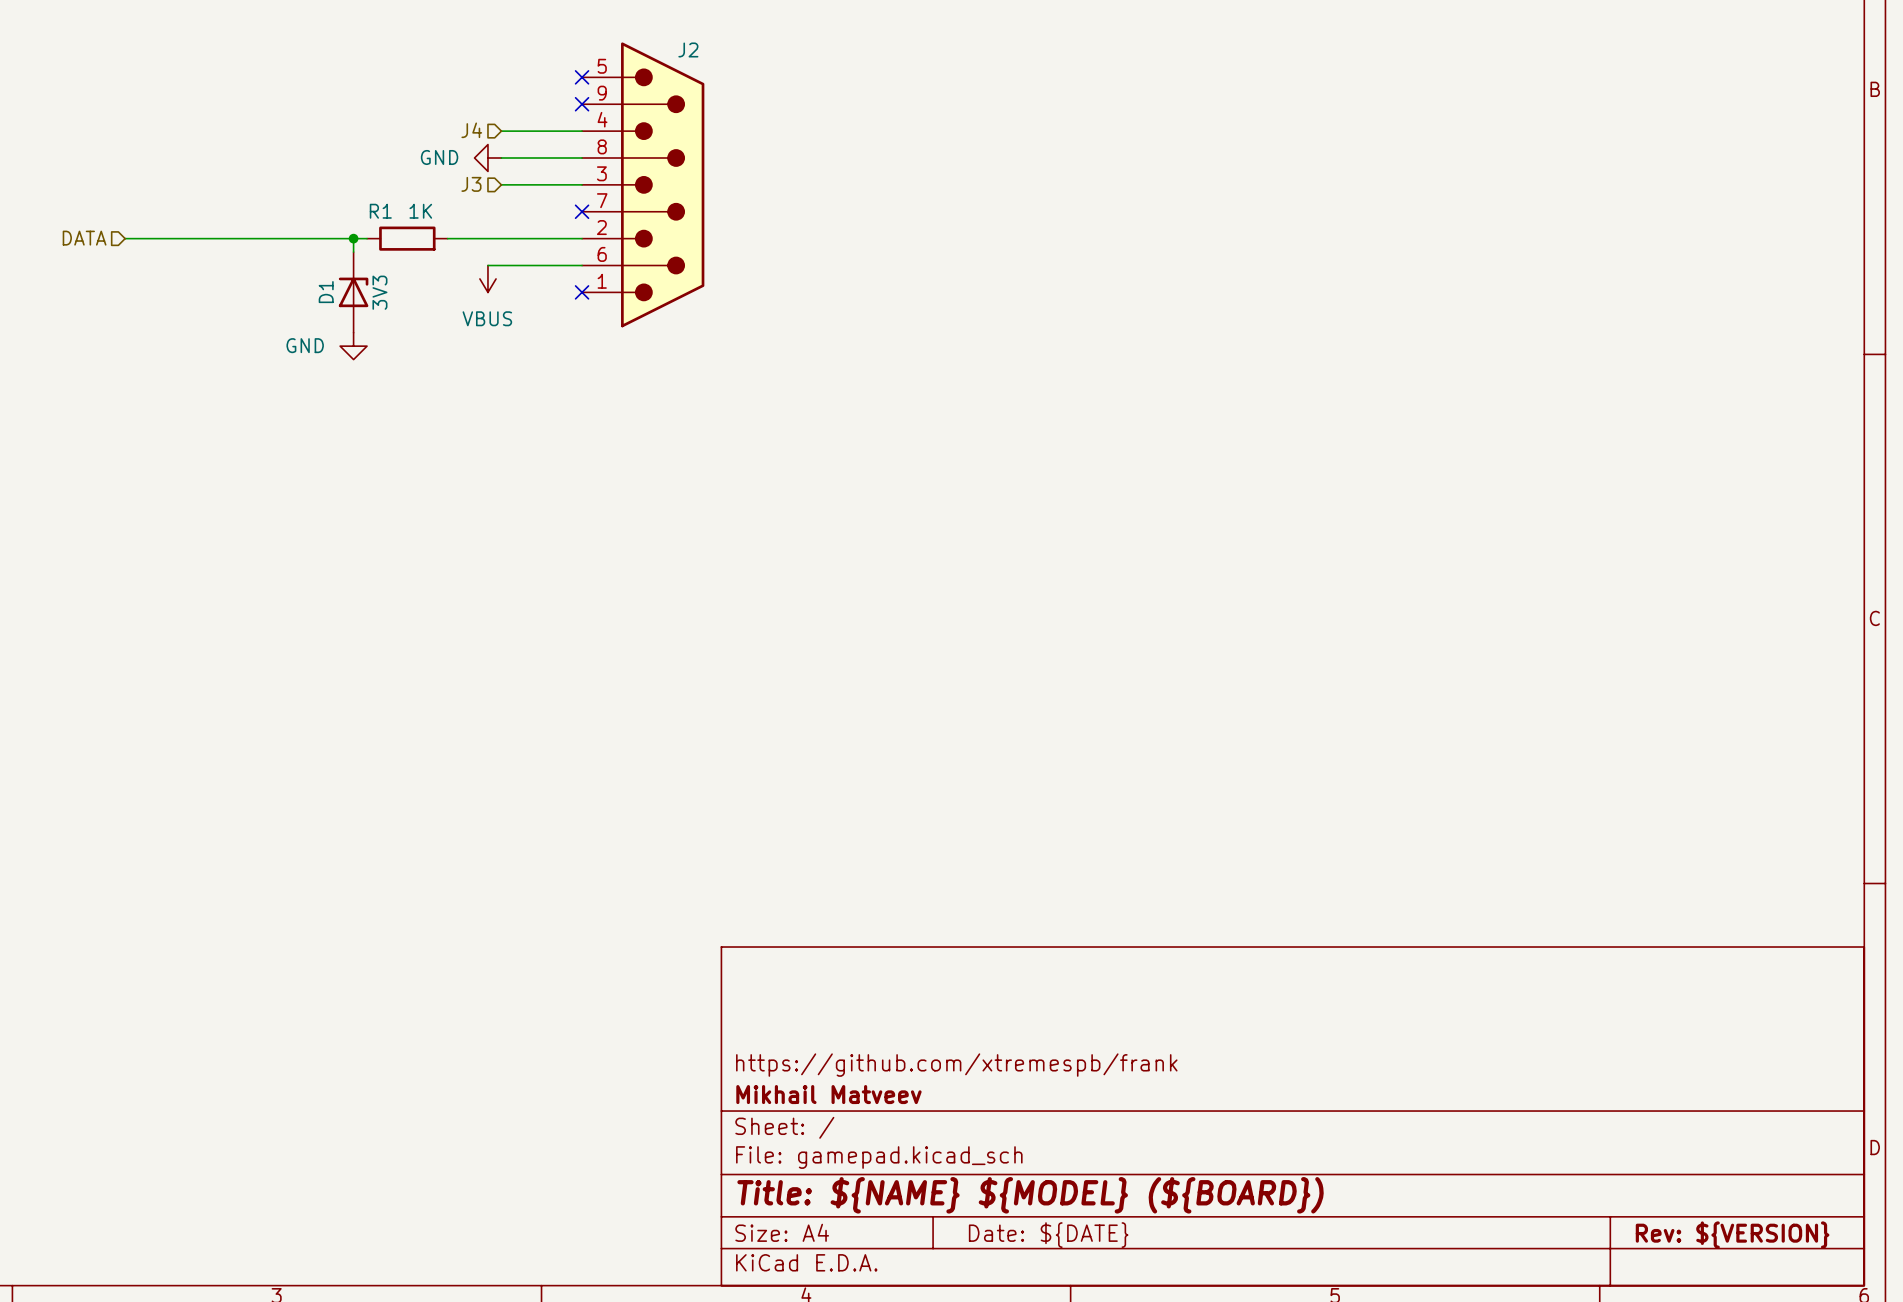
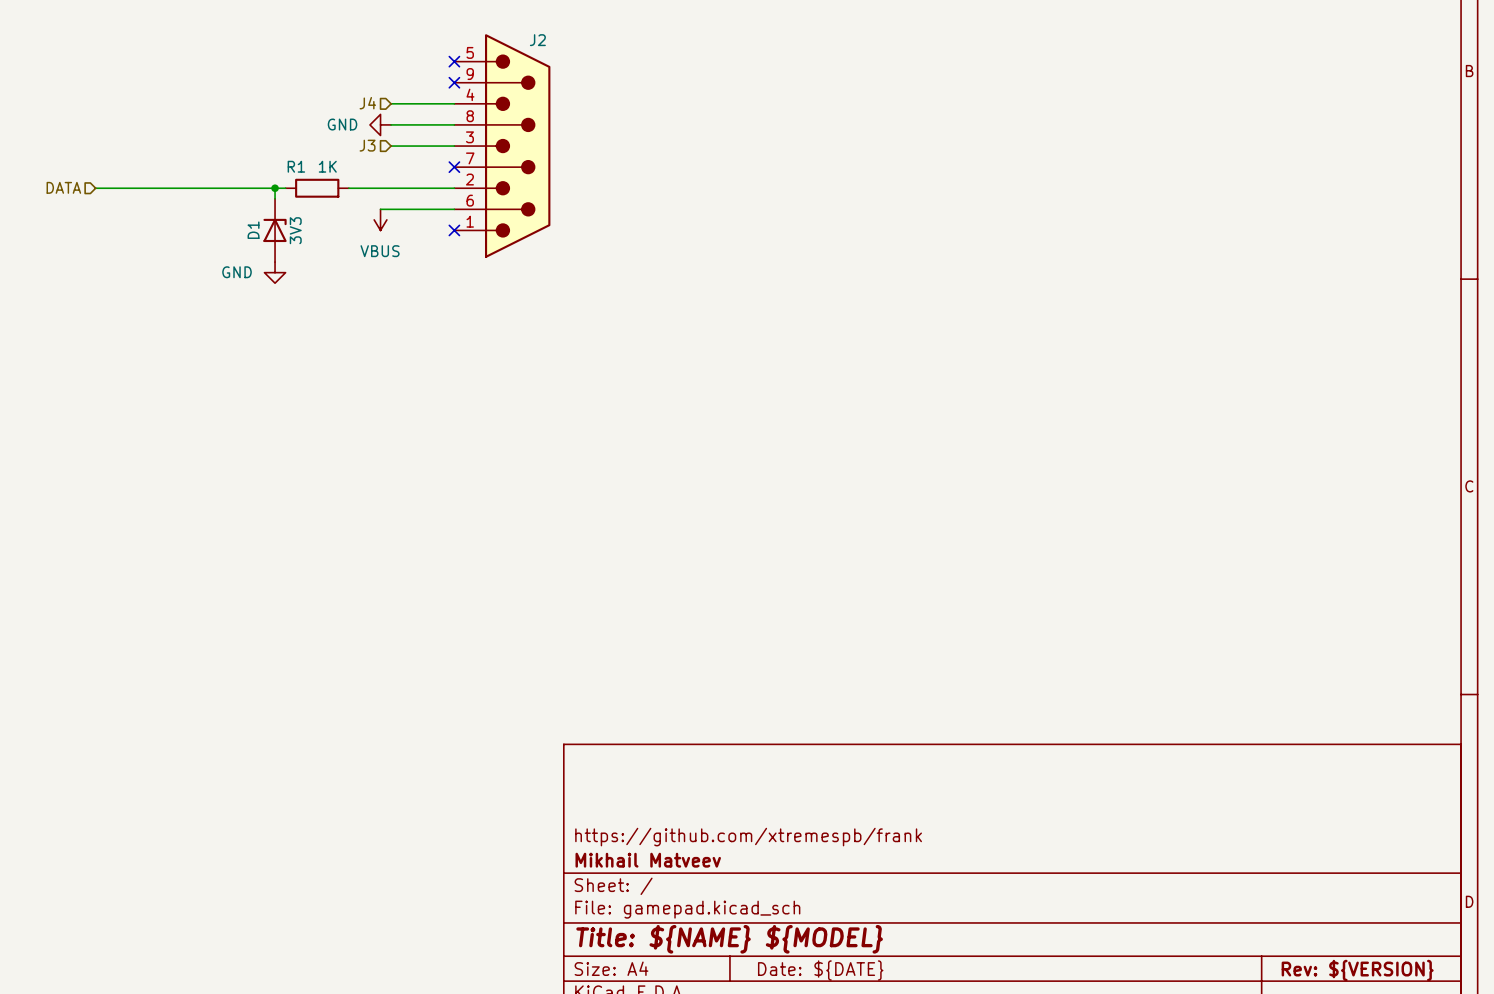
title block: Title: ${NAME} ${MODEL} (${BOARD}) (1030, 1195) -> Title: ${NAME} ${MODEL} (729, 939)

